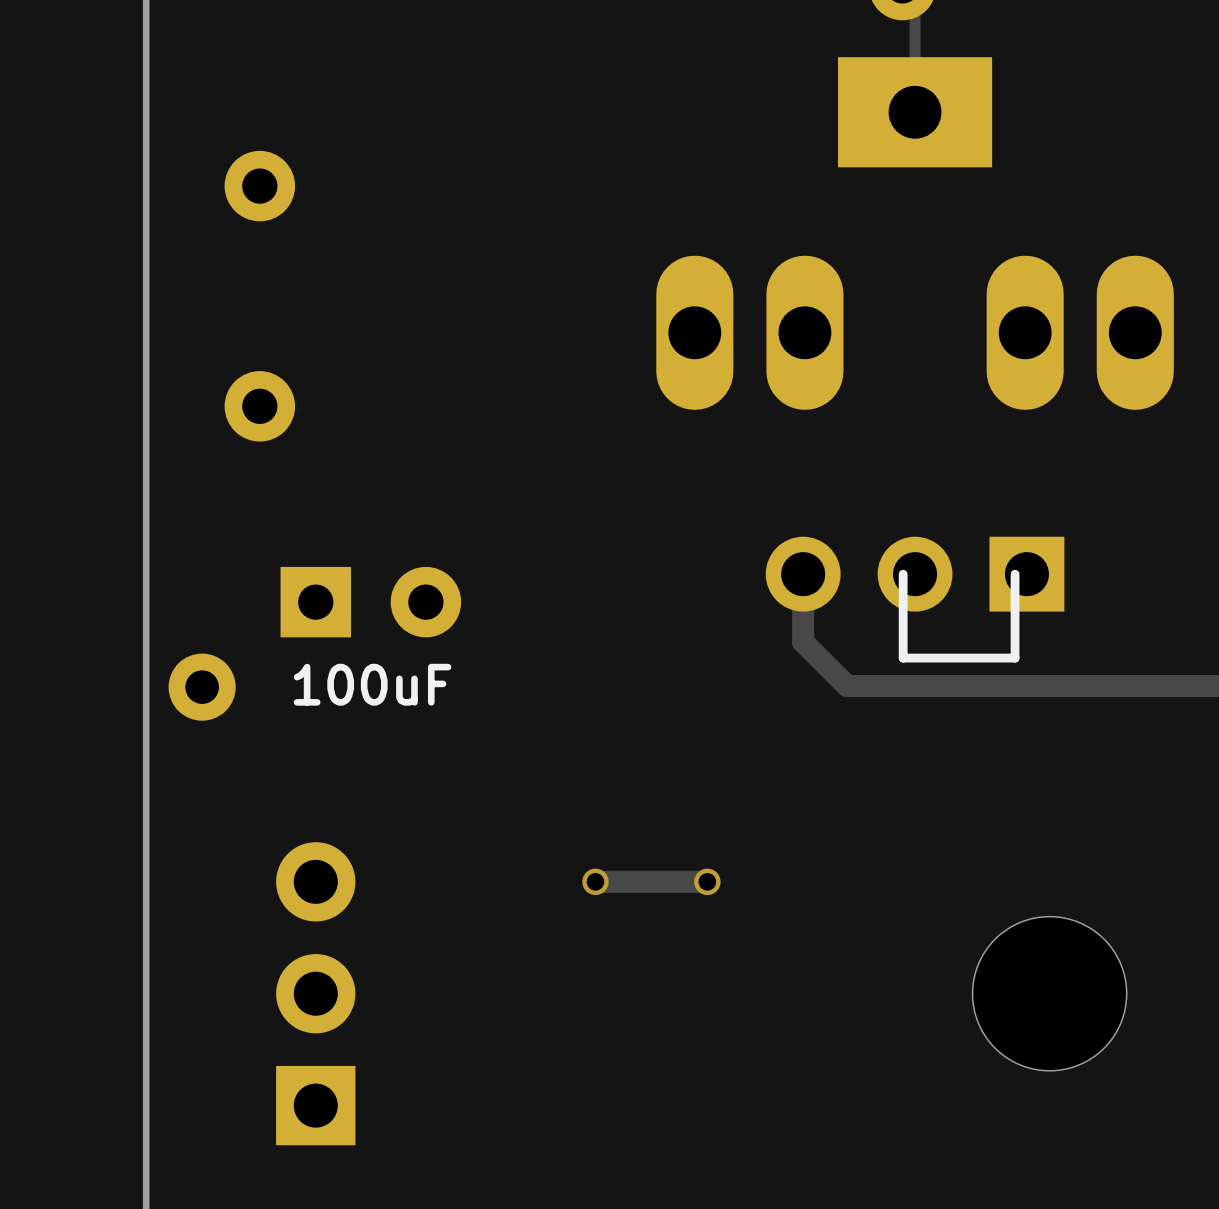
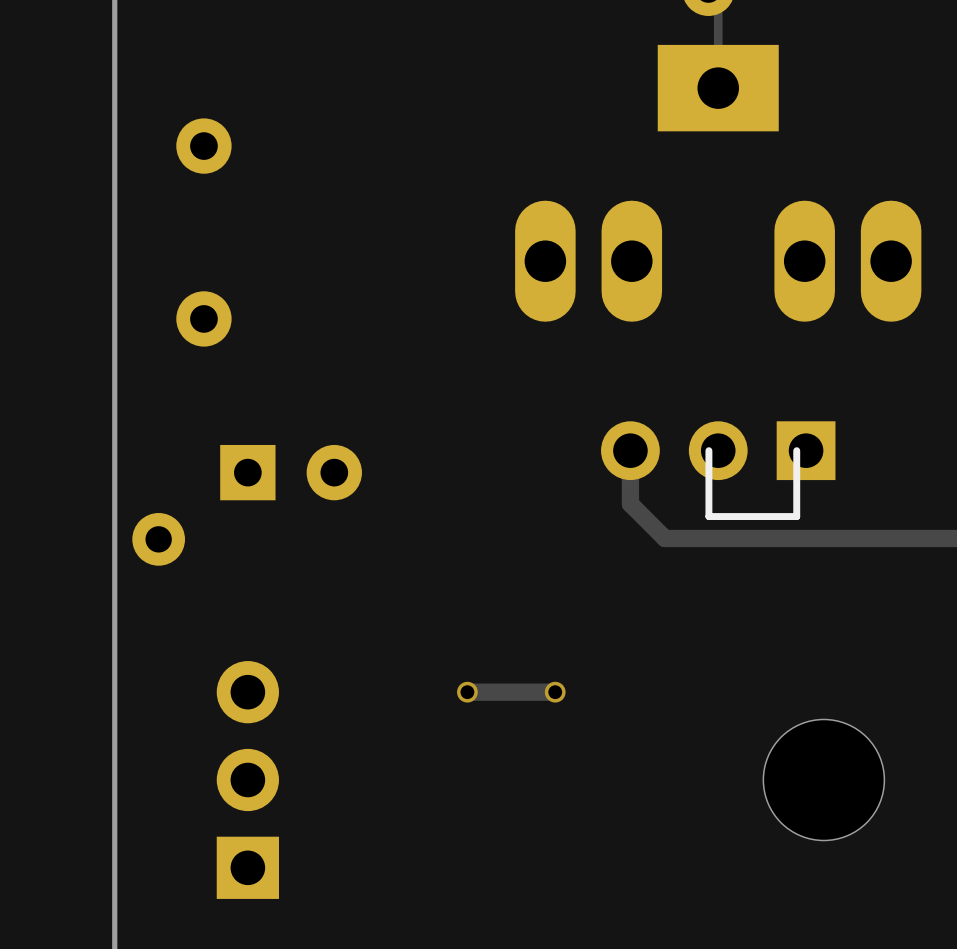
part value: 100uF (372, 684) -> none

